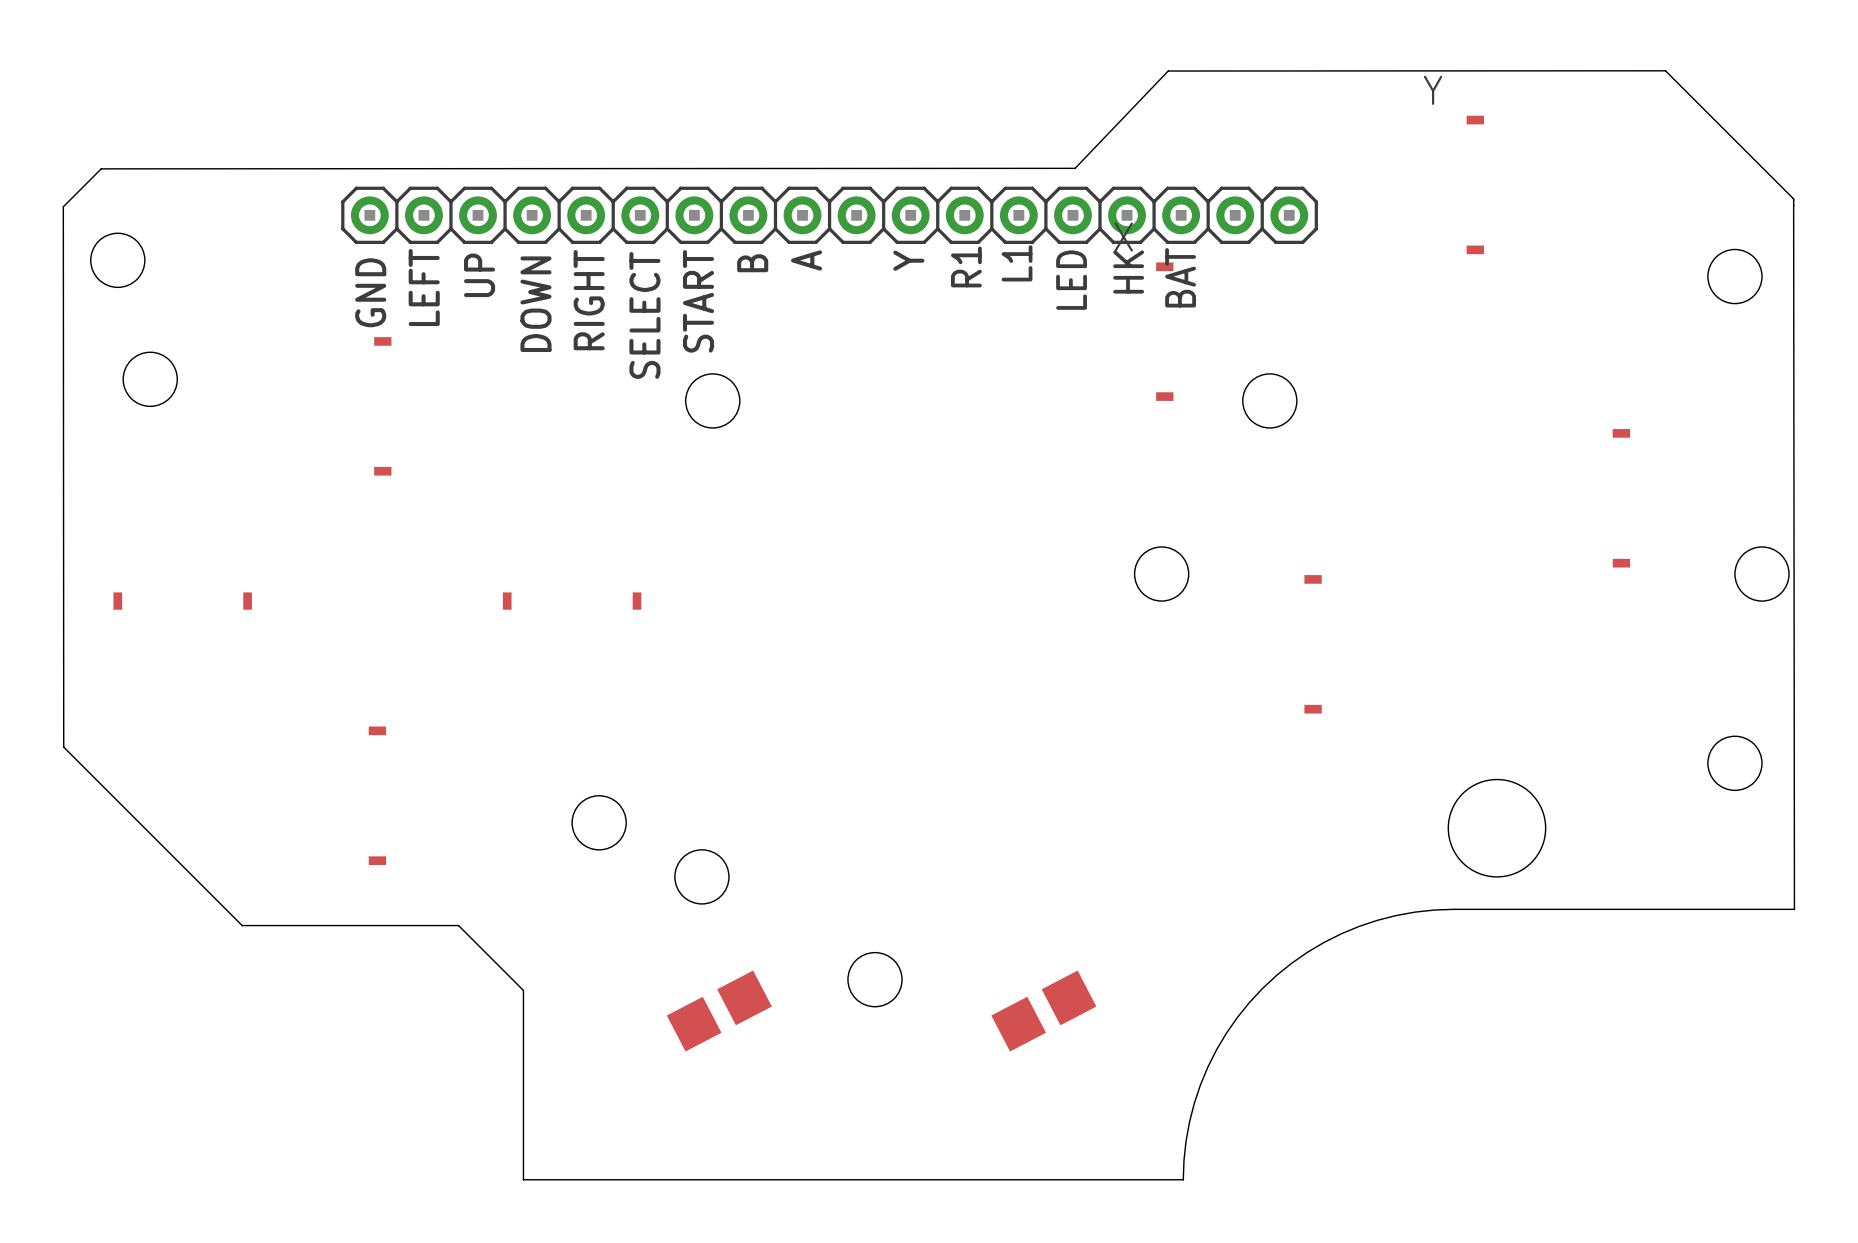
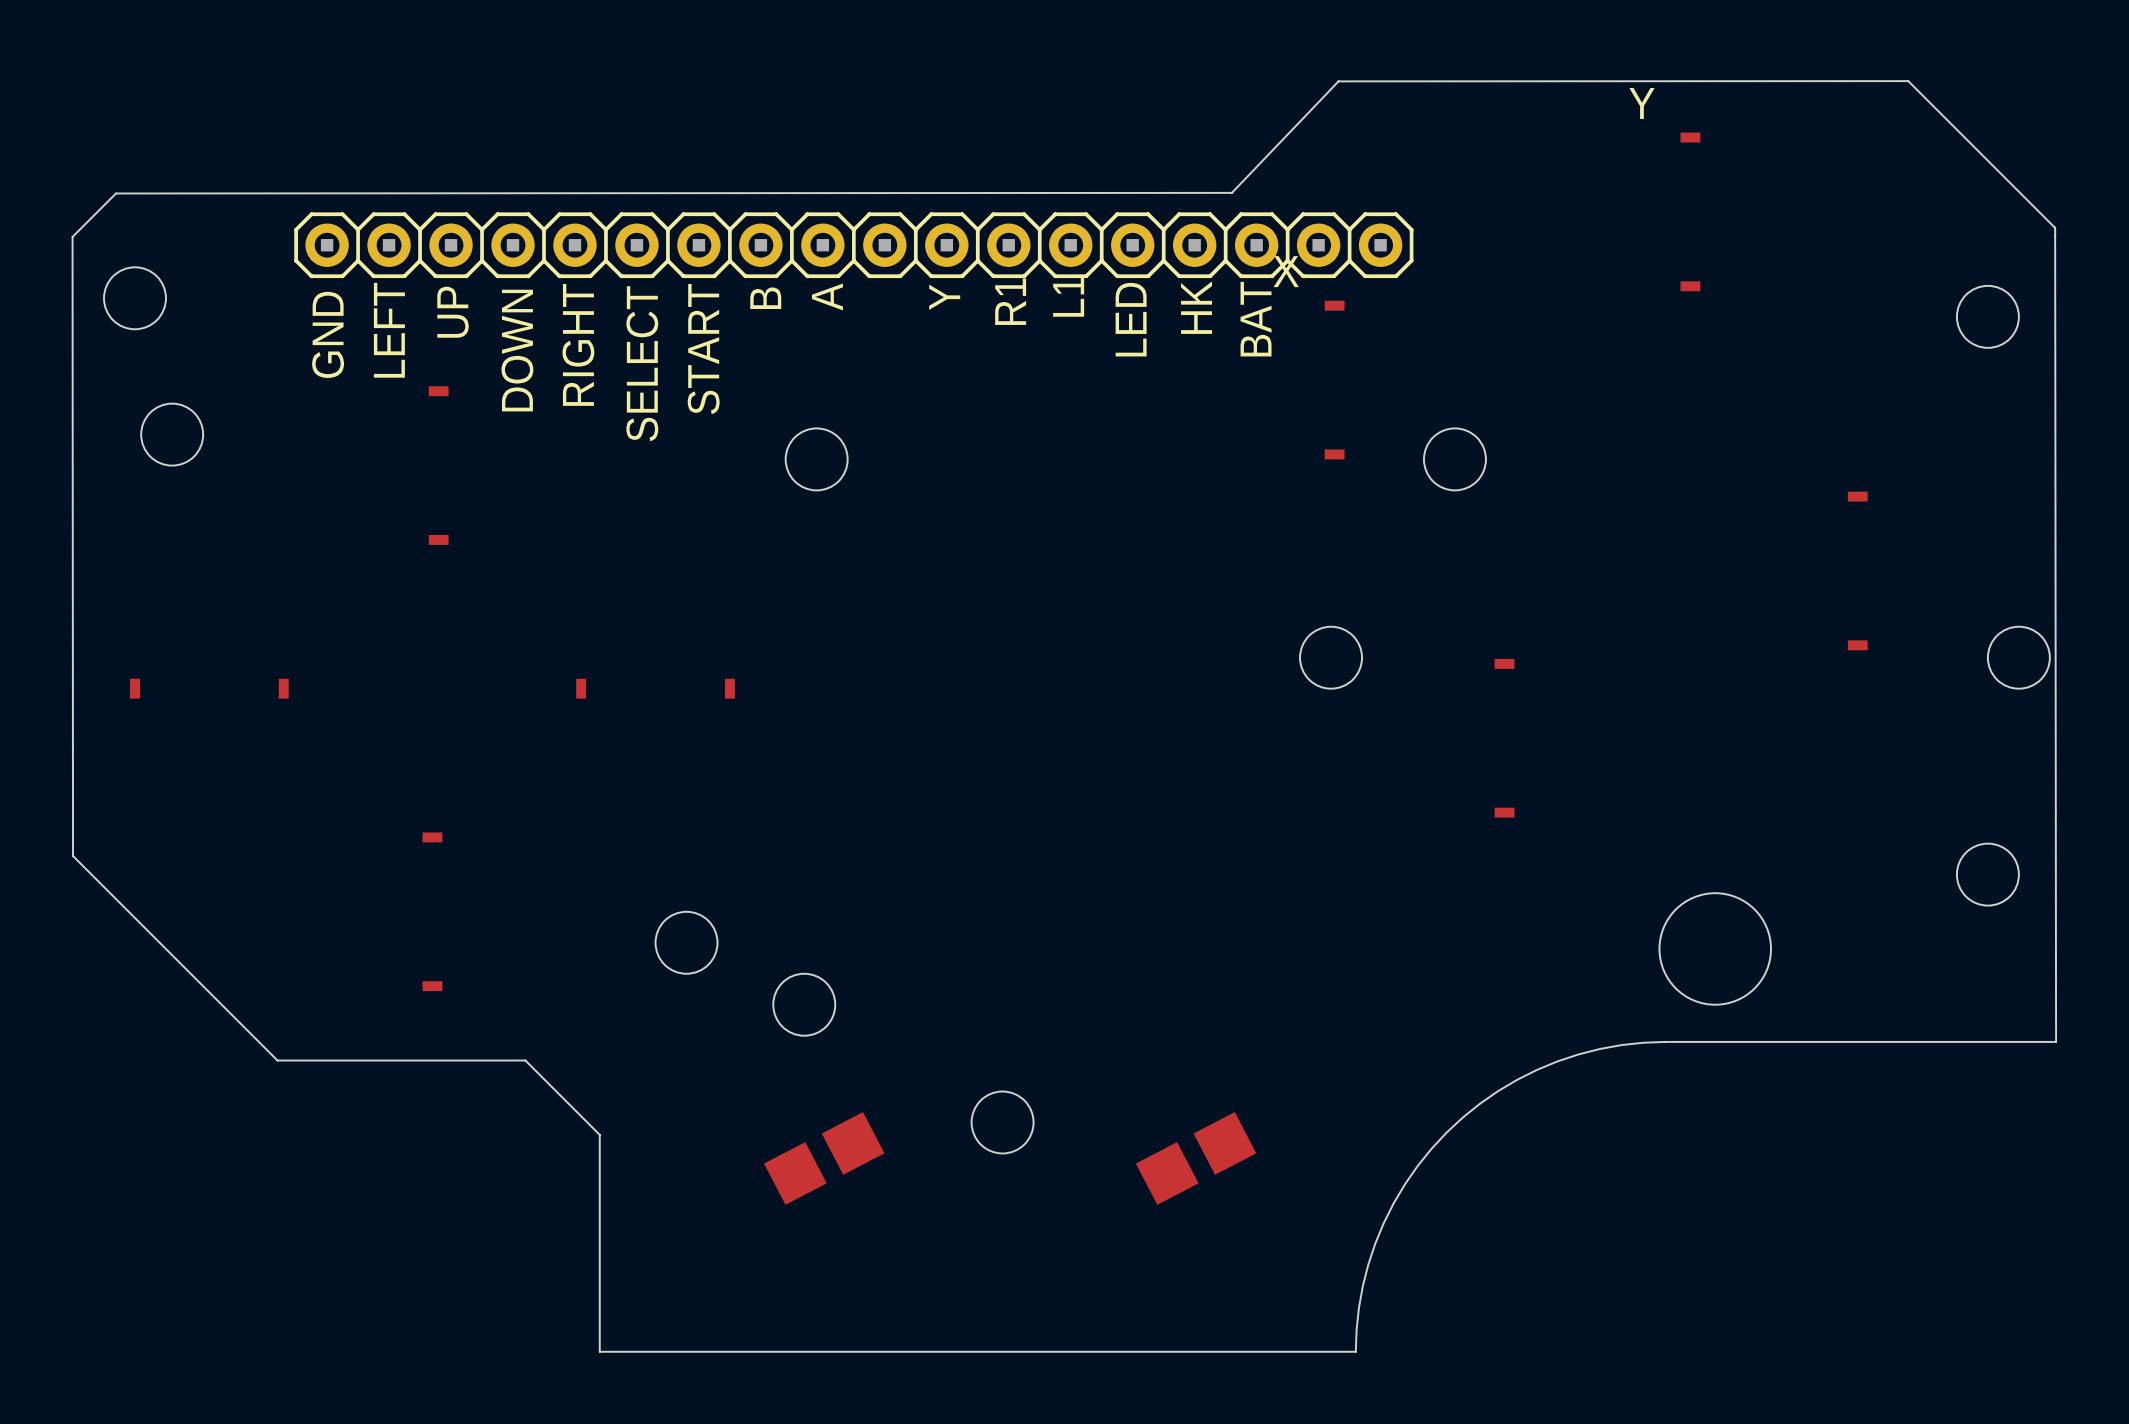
part position: (829, 215) -> (853, 245)
text position: A (806, 260) -> A (827, 296)
text position: Y (908, 260) -> Y (944, 297)
text position: B (752, 263) -> B (765, 298)
text position: L1 (1017, 263) -> L1 (1068, 296)
text position: R1 (966, 266) -> R1 (1010, 301)
text position: HK (1128, 272) -> HK (1196, 307)
text position: UP (479, 275) -> UP (453, 312)
text position: BAT (1180, 277) -> BAT (1256, 319)
text position: LED (1071, 280) -> LED (1131, 319)
text position: LEFT (424, 287) -> LEFT (389, 330)
text position: GND (370, 292) -> GND (328, 334)
text position: RIGHT (589, 300) -> RIGHT (578, 344)
text position: START (698, 301) -> START (703, 349)
text position: DOWN (535, 304) -> DOWN (517, 350)
text position: SELECT (644, 315) -> SELECT (642, 363)

